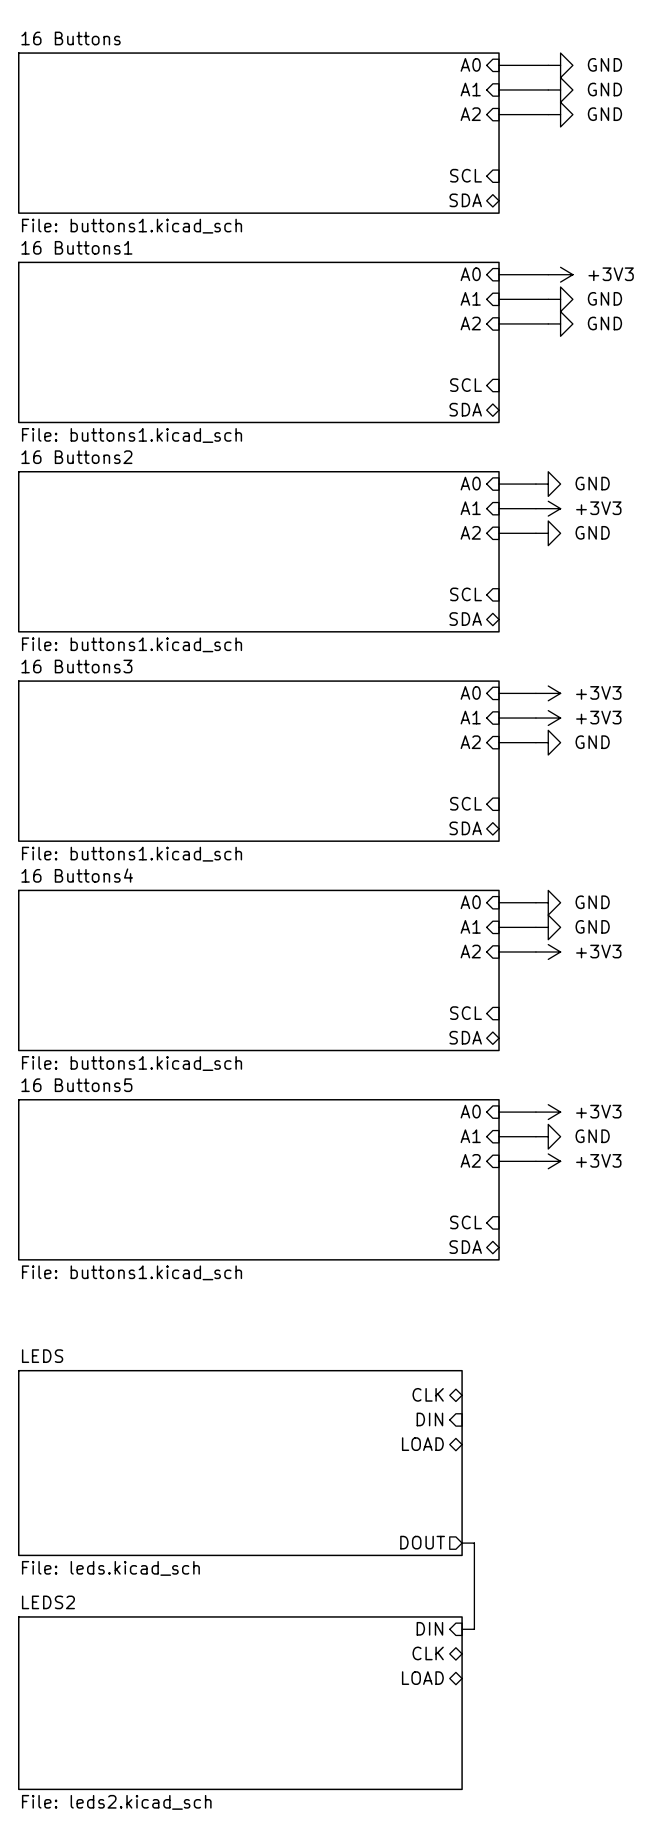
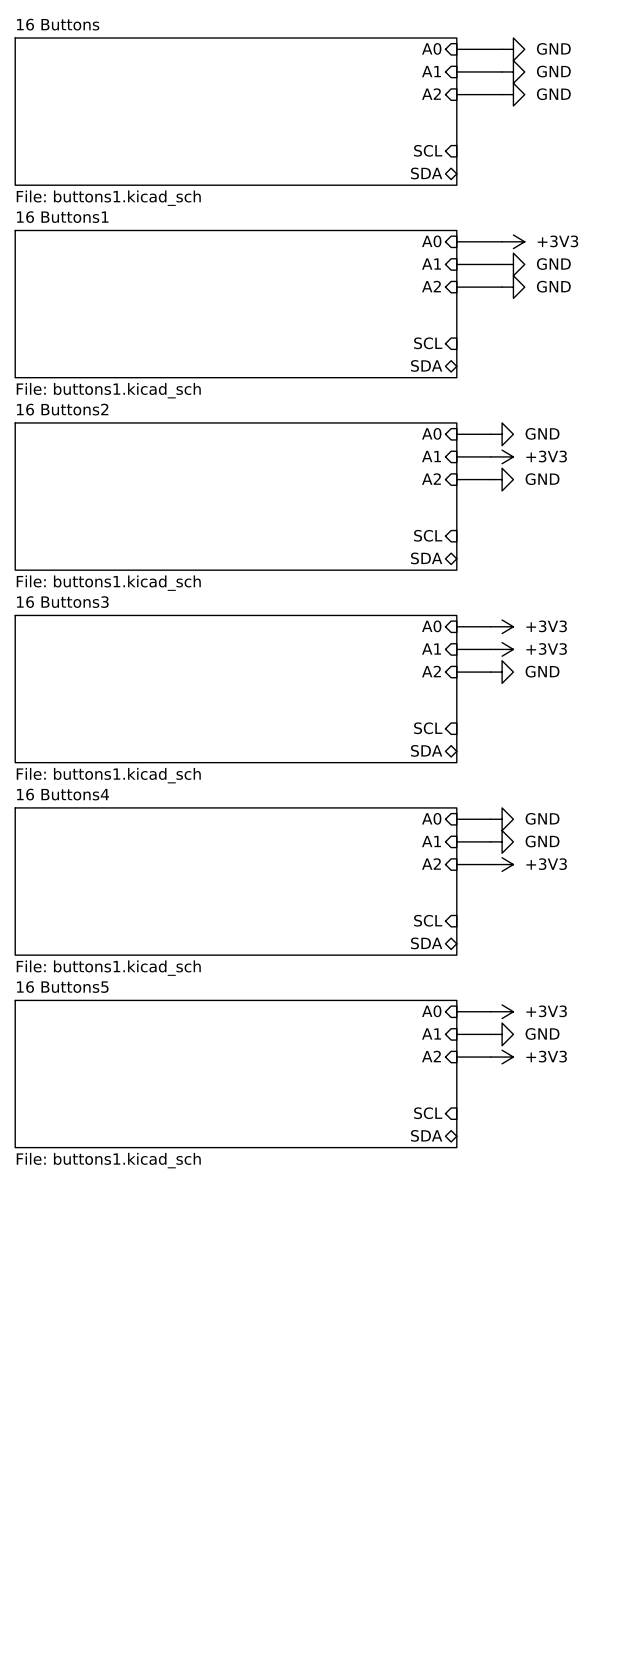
sheet pin: CLK (428, 1394) -> none
sheet pin: DIN (429, 1419) -> none
sheet pin: LOAD (422, 1444) -> none
sheet LEDS: File: leds.kicad_sch (240, 1463) -> none
sheet pin: DOUT (422, 1542) -> none
wire: (462, 1543) (474, 1543) (474, 1629) (462, 1629) -> none
sheet pin: DIN (429, 1628) -> none
sheet pin: CLK (428, 1653) -> none
sheet pin: LOAD (422, 1678) -> none
sheet LEDS2: File: leds2.kicad_sch (240, 1703) -> none

